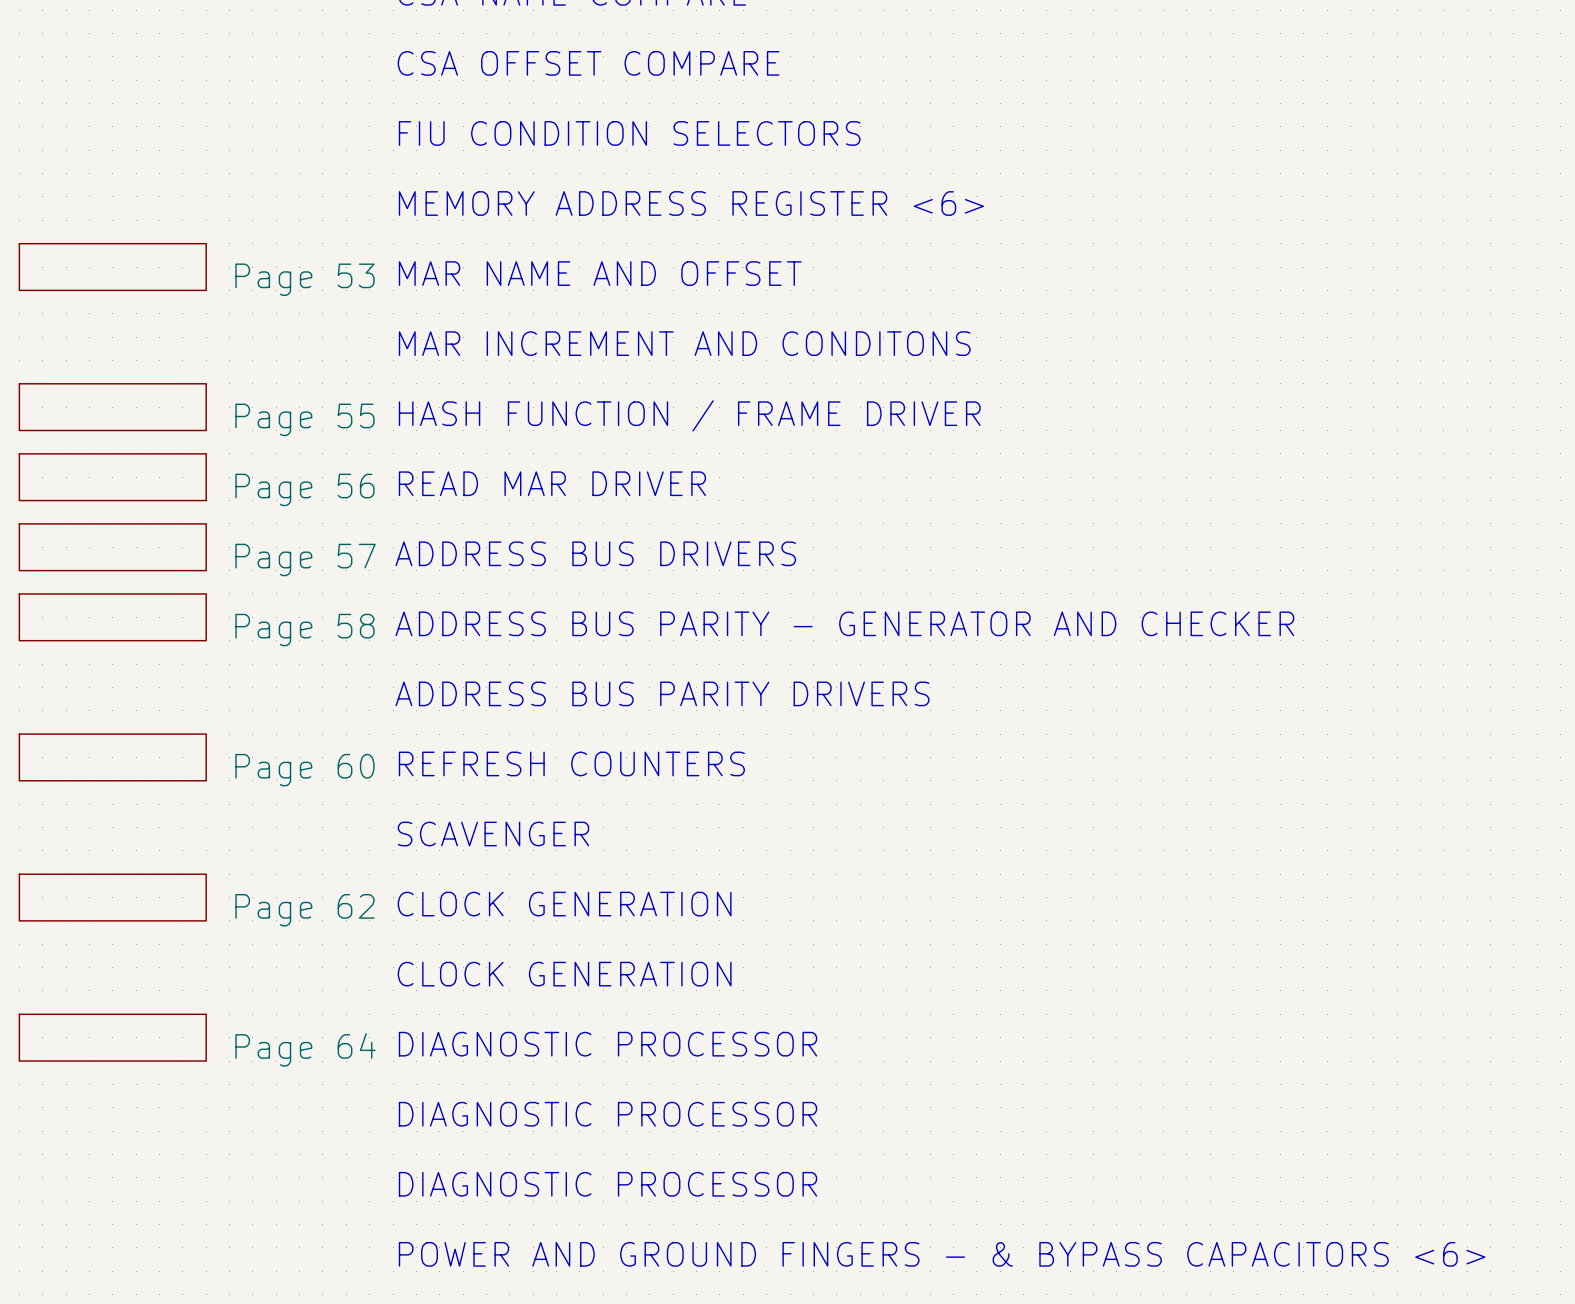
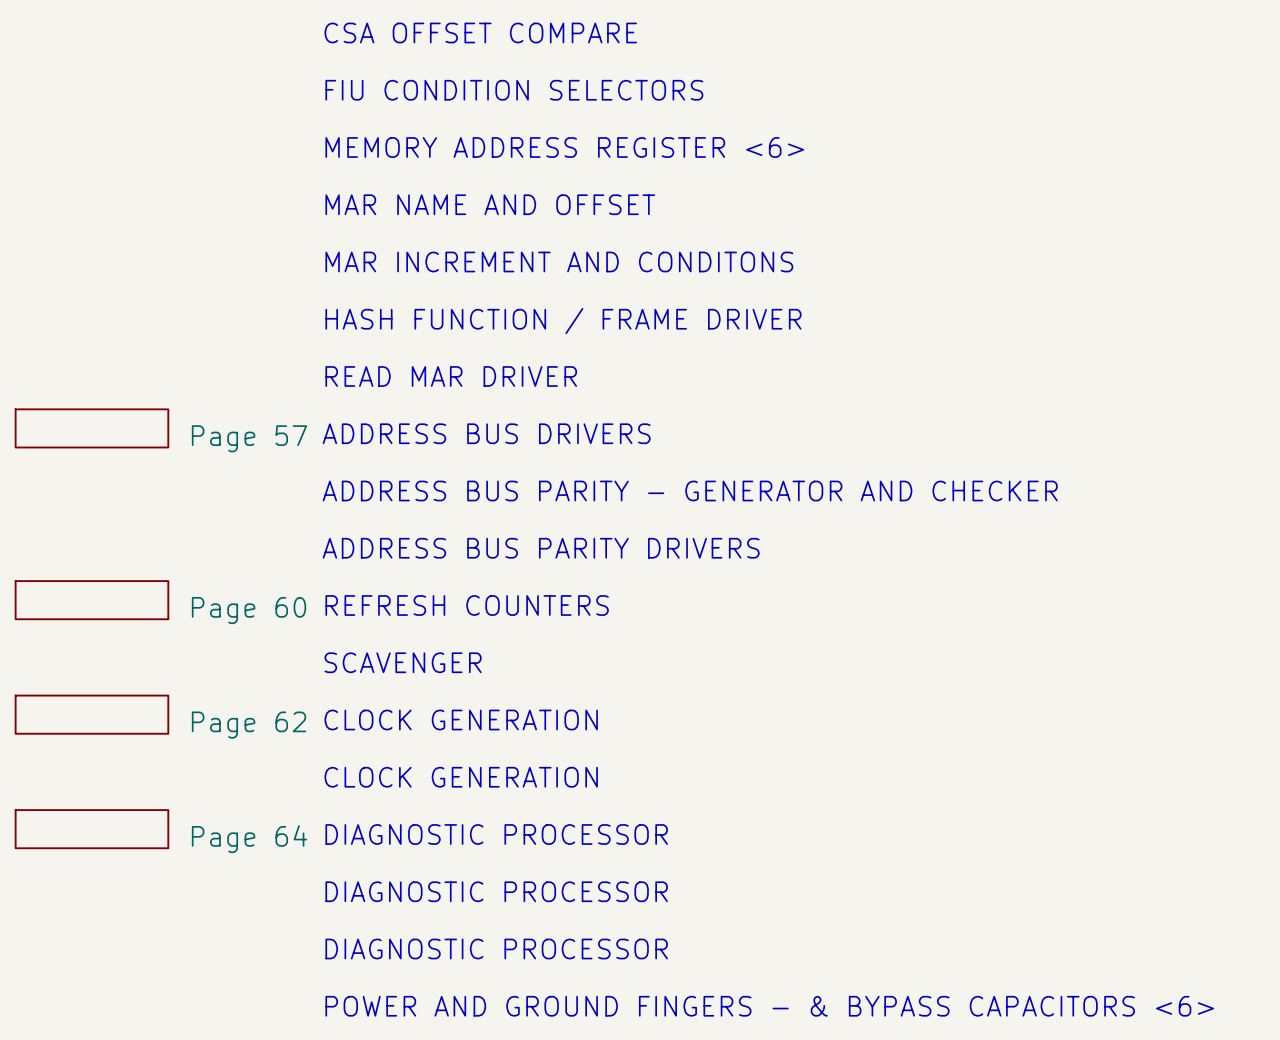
sheet Page 53: (112, 267) -> none
sheet Page 55: (112, 407) -> none
sheet Page 56: (112, 477) -> none
sheet Page 58: (112, 617) -> none

